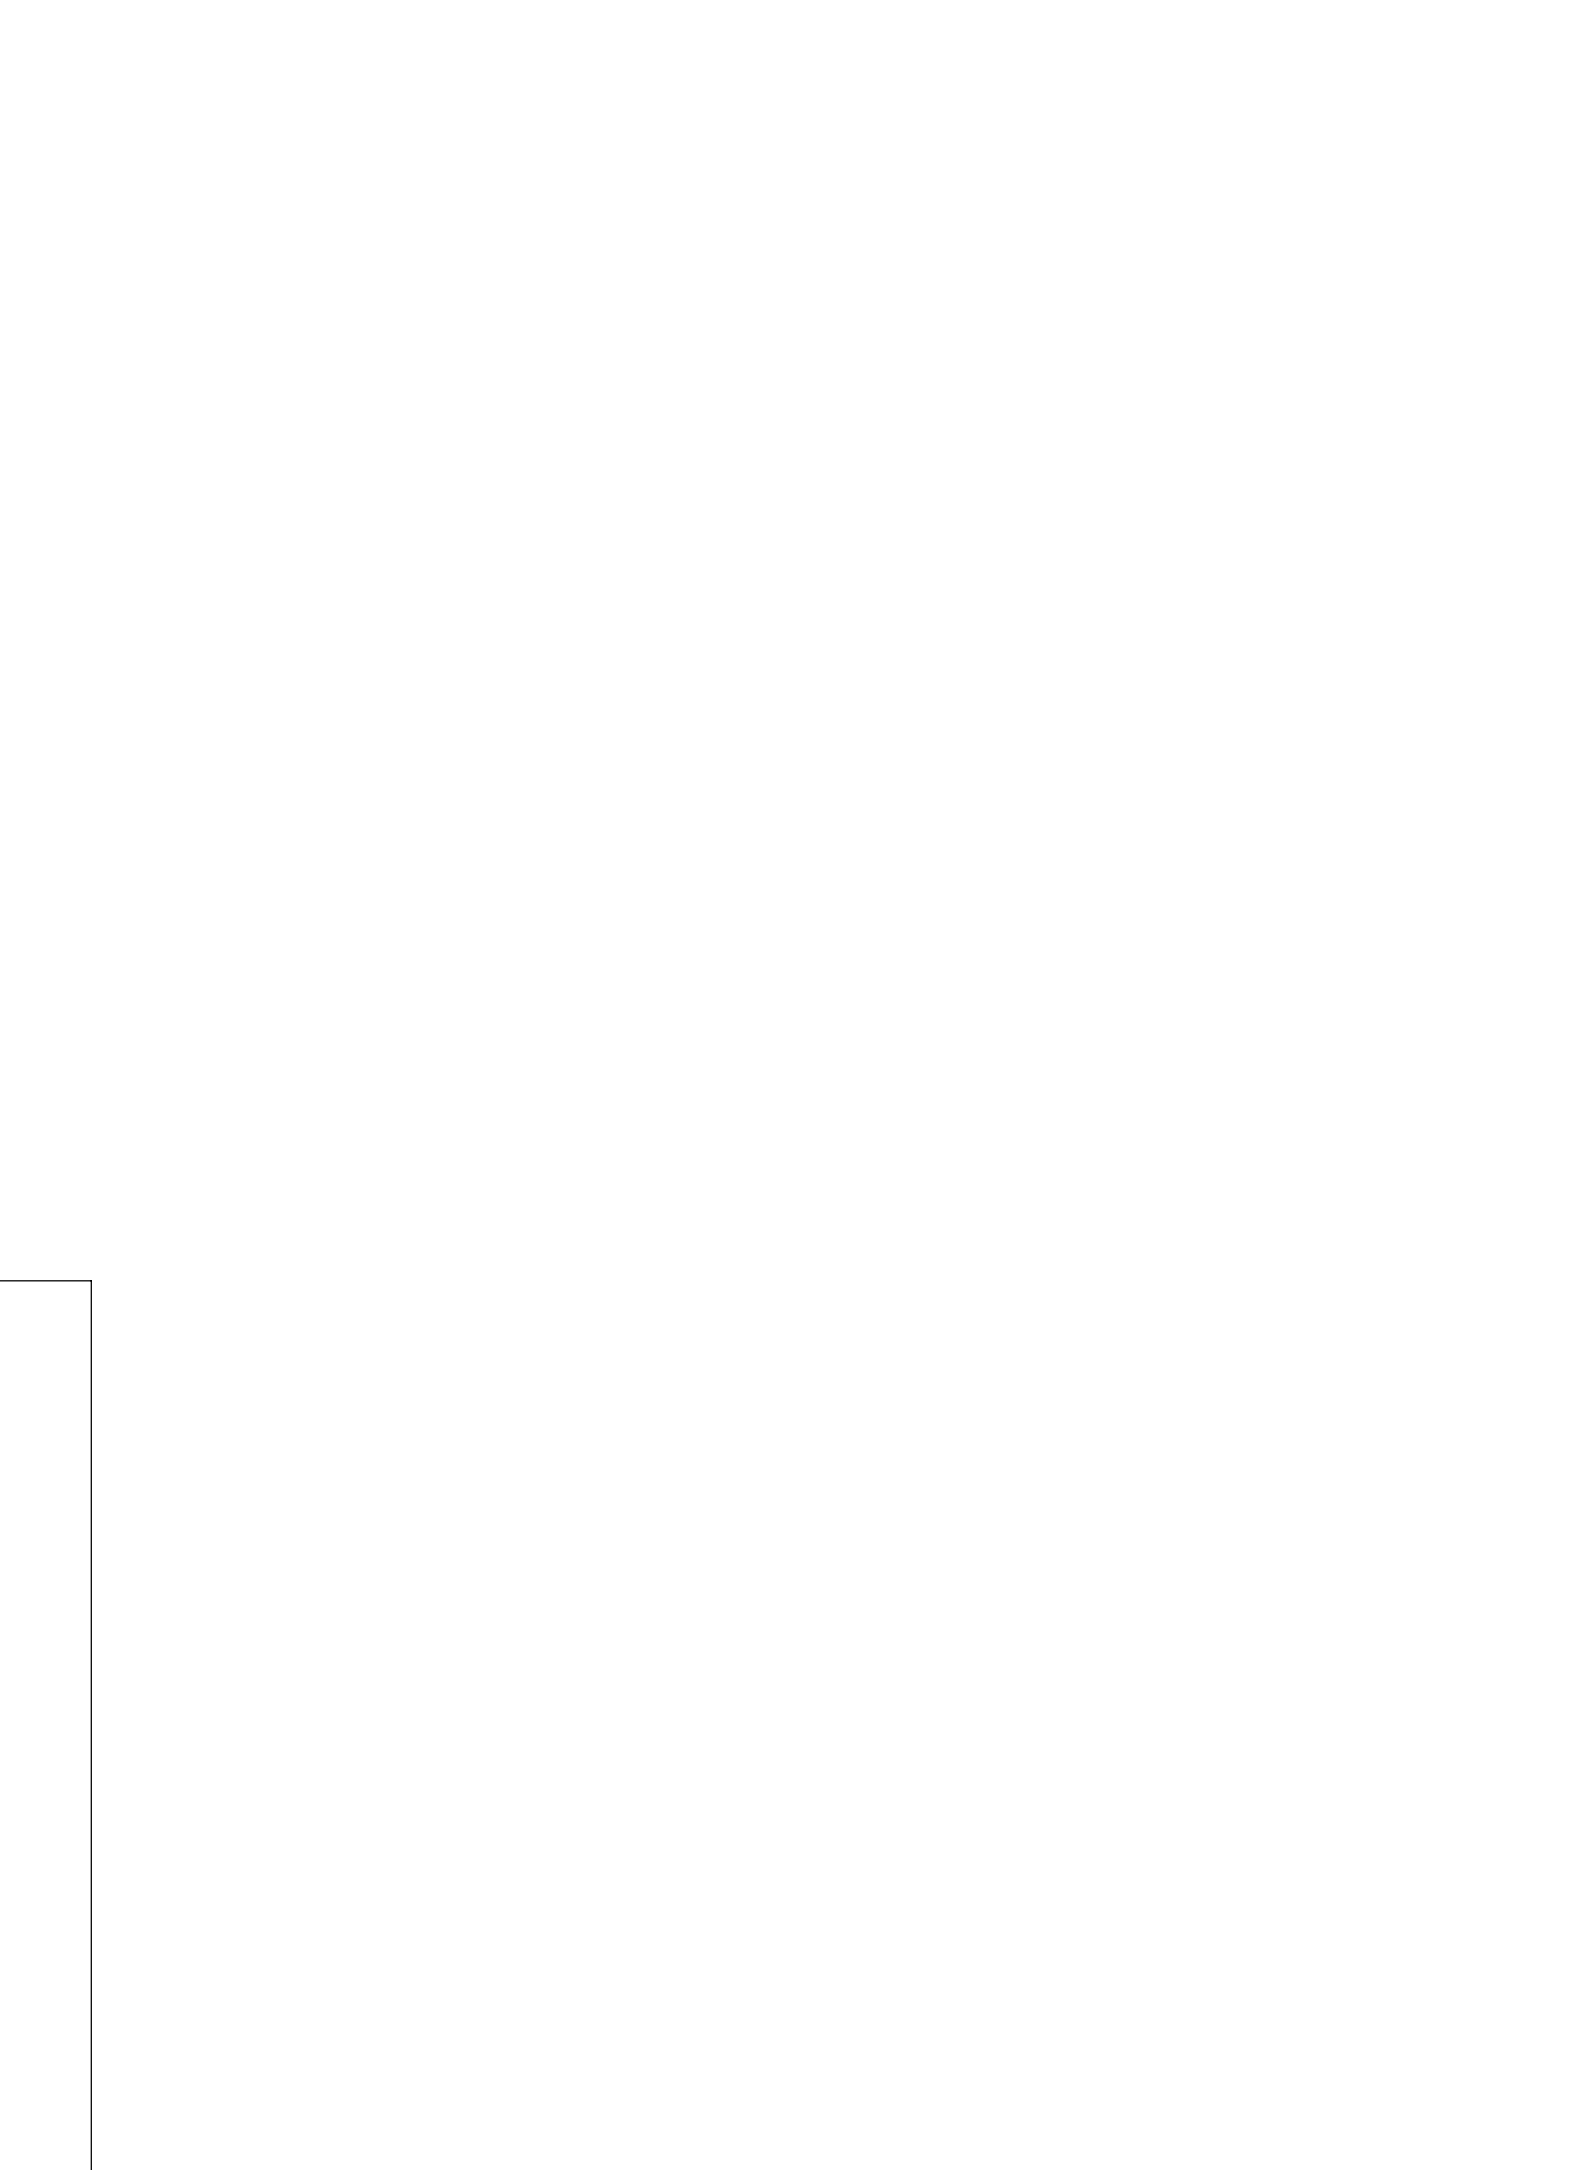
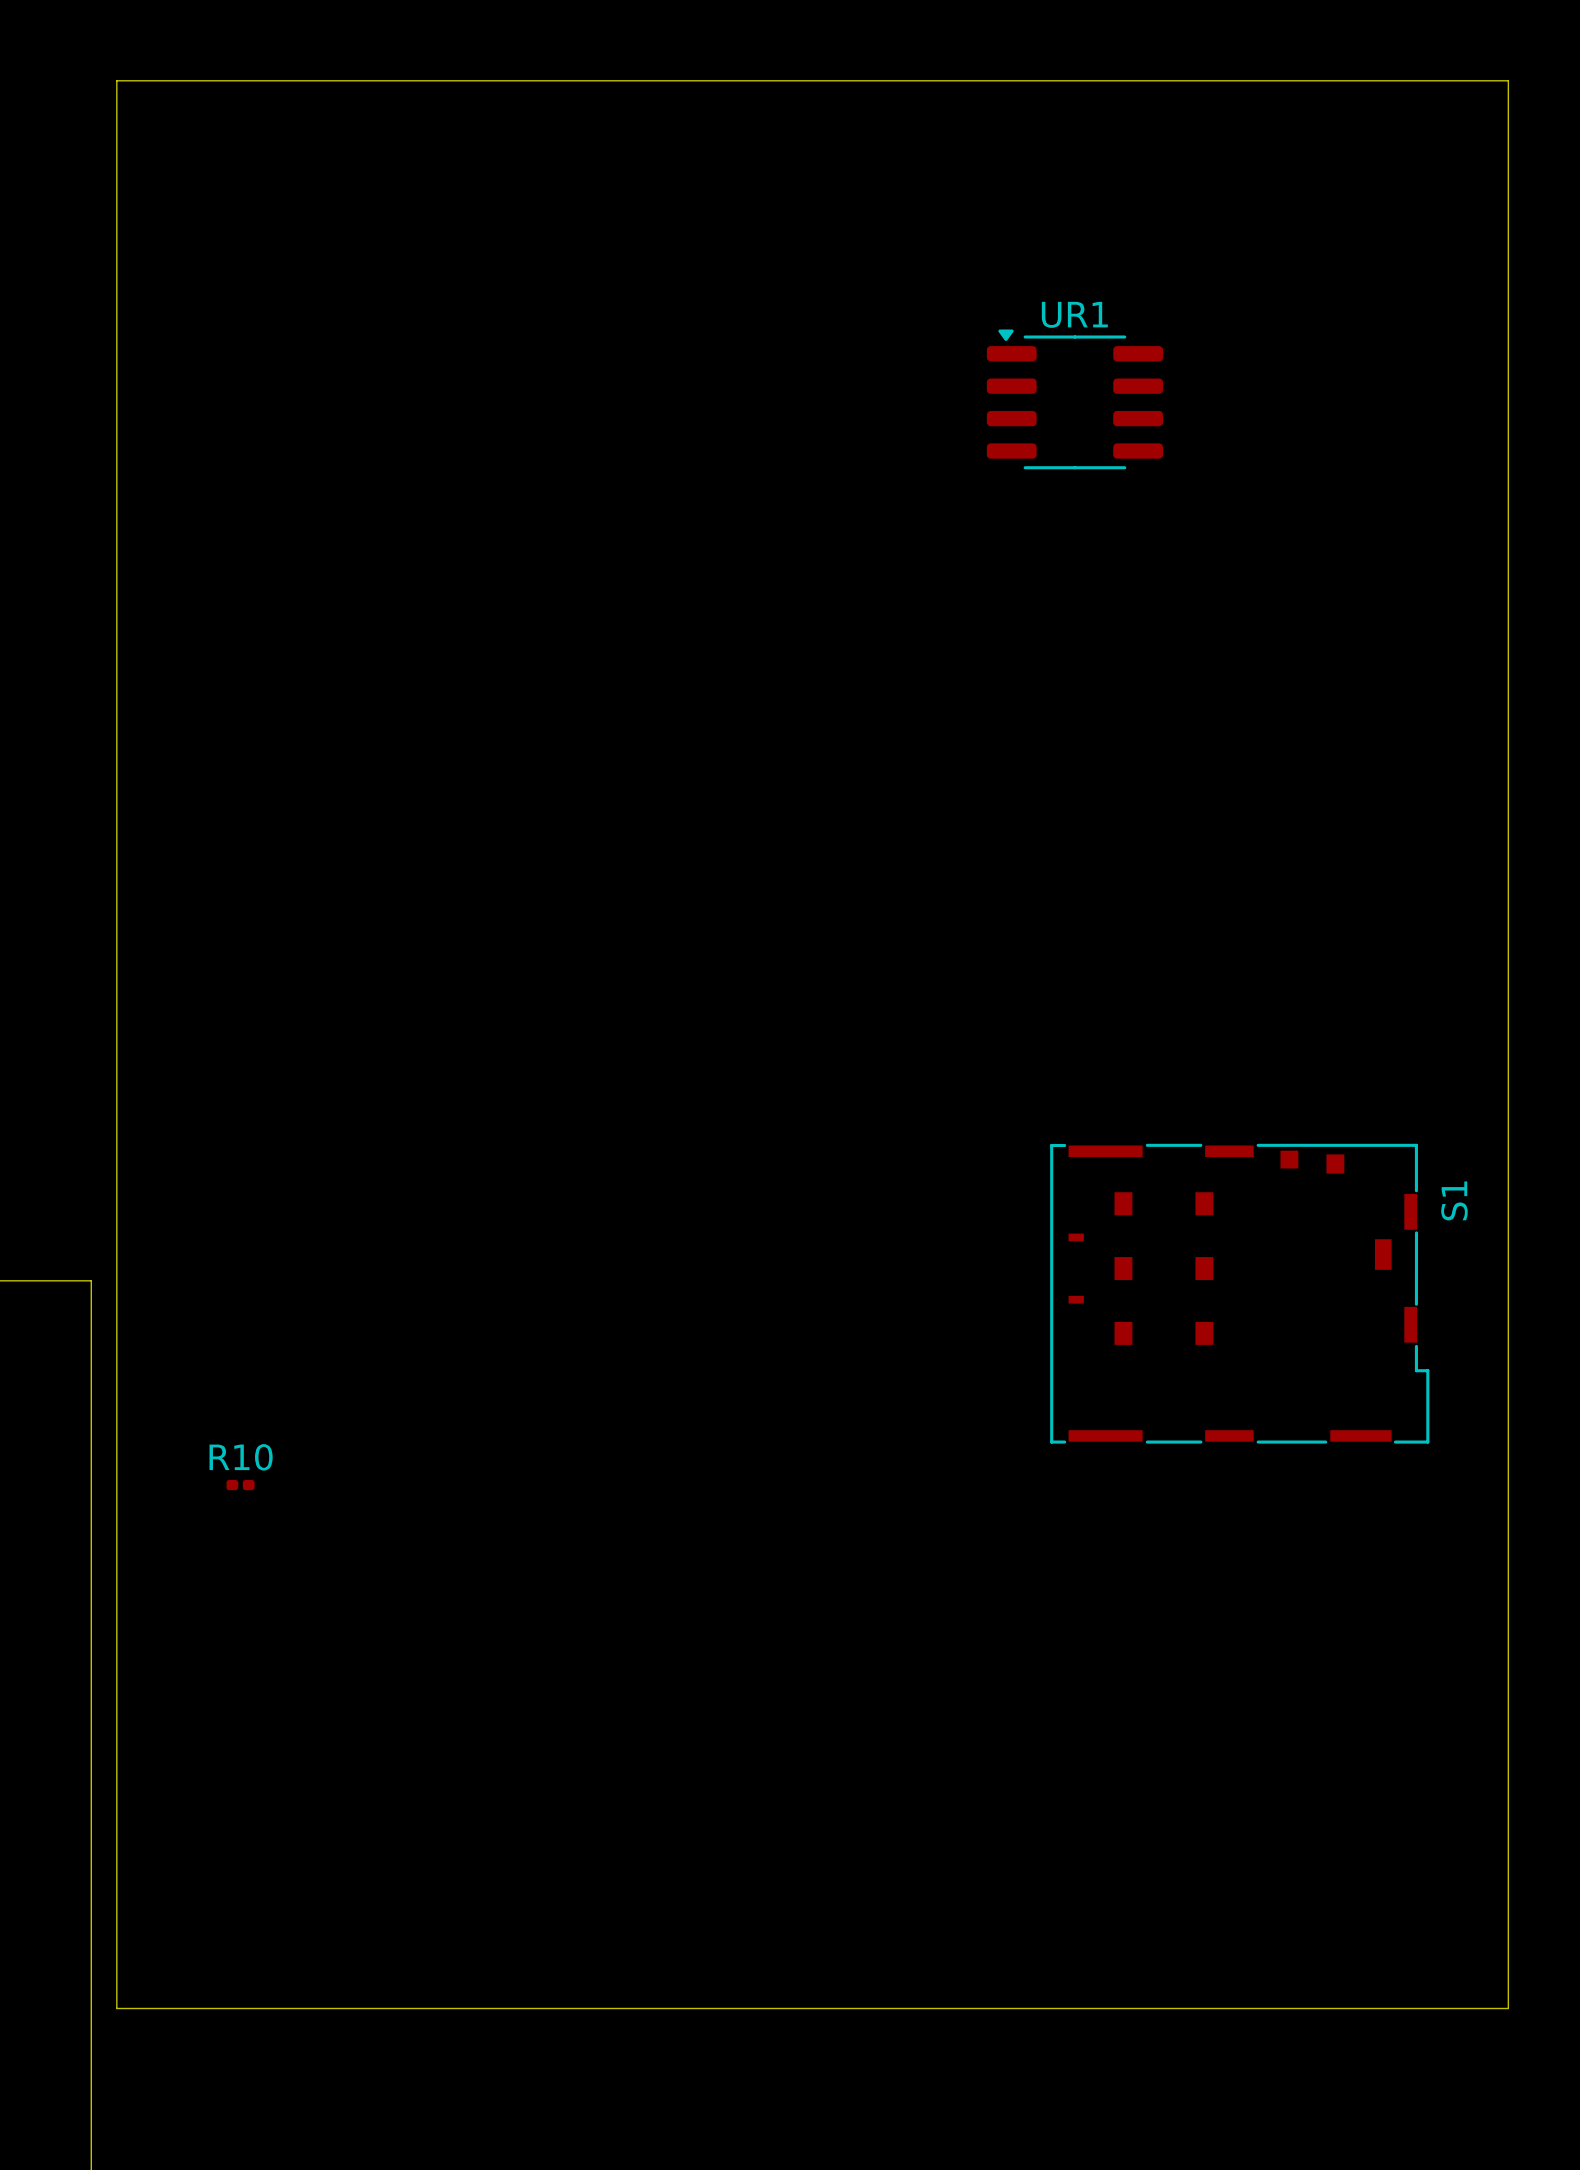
board edge: none -> (116, 80) (1508, 80) (1508, 2008) (116, 2008) (116, 80)
UR1: none -> (1074, 399)
S1: none -> (1239, 1293)
R10: none -> (240, 1485)

